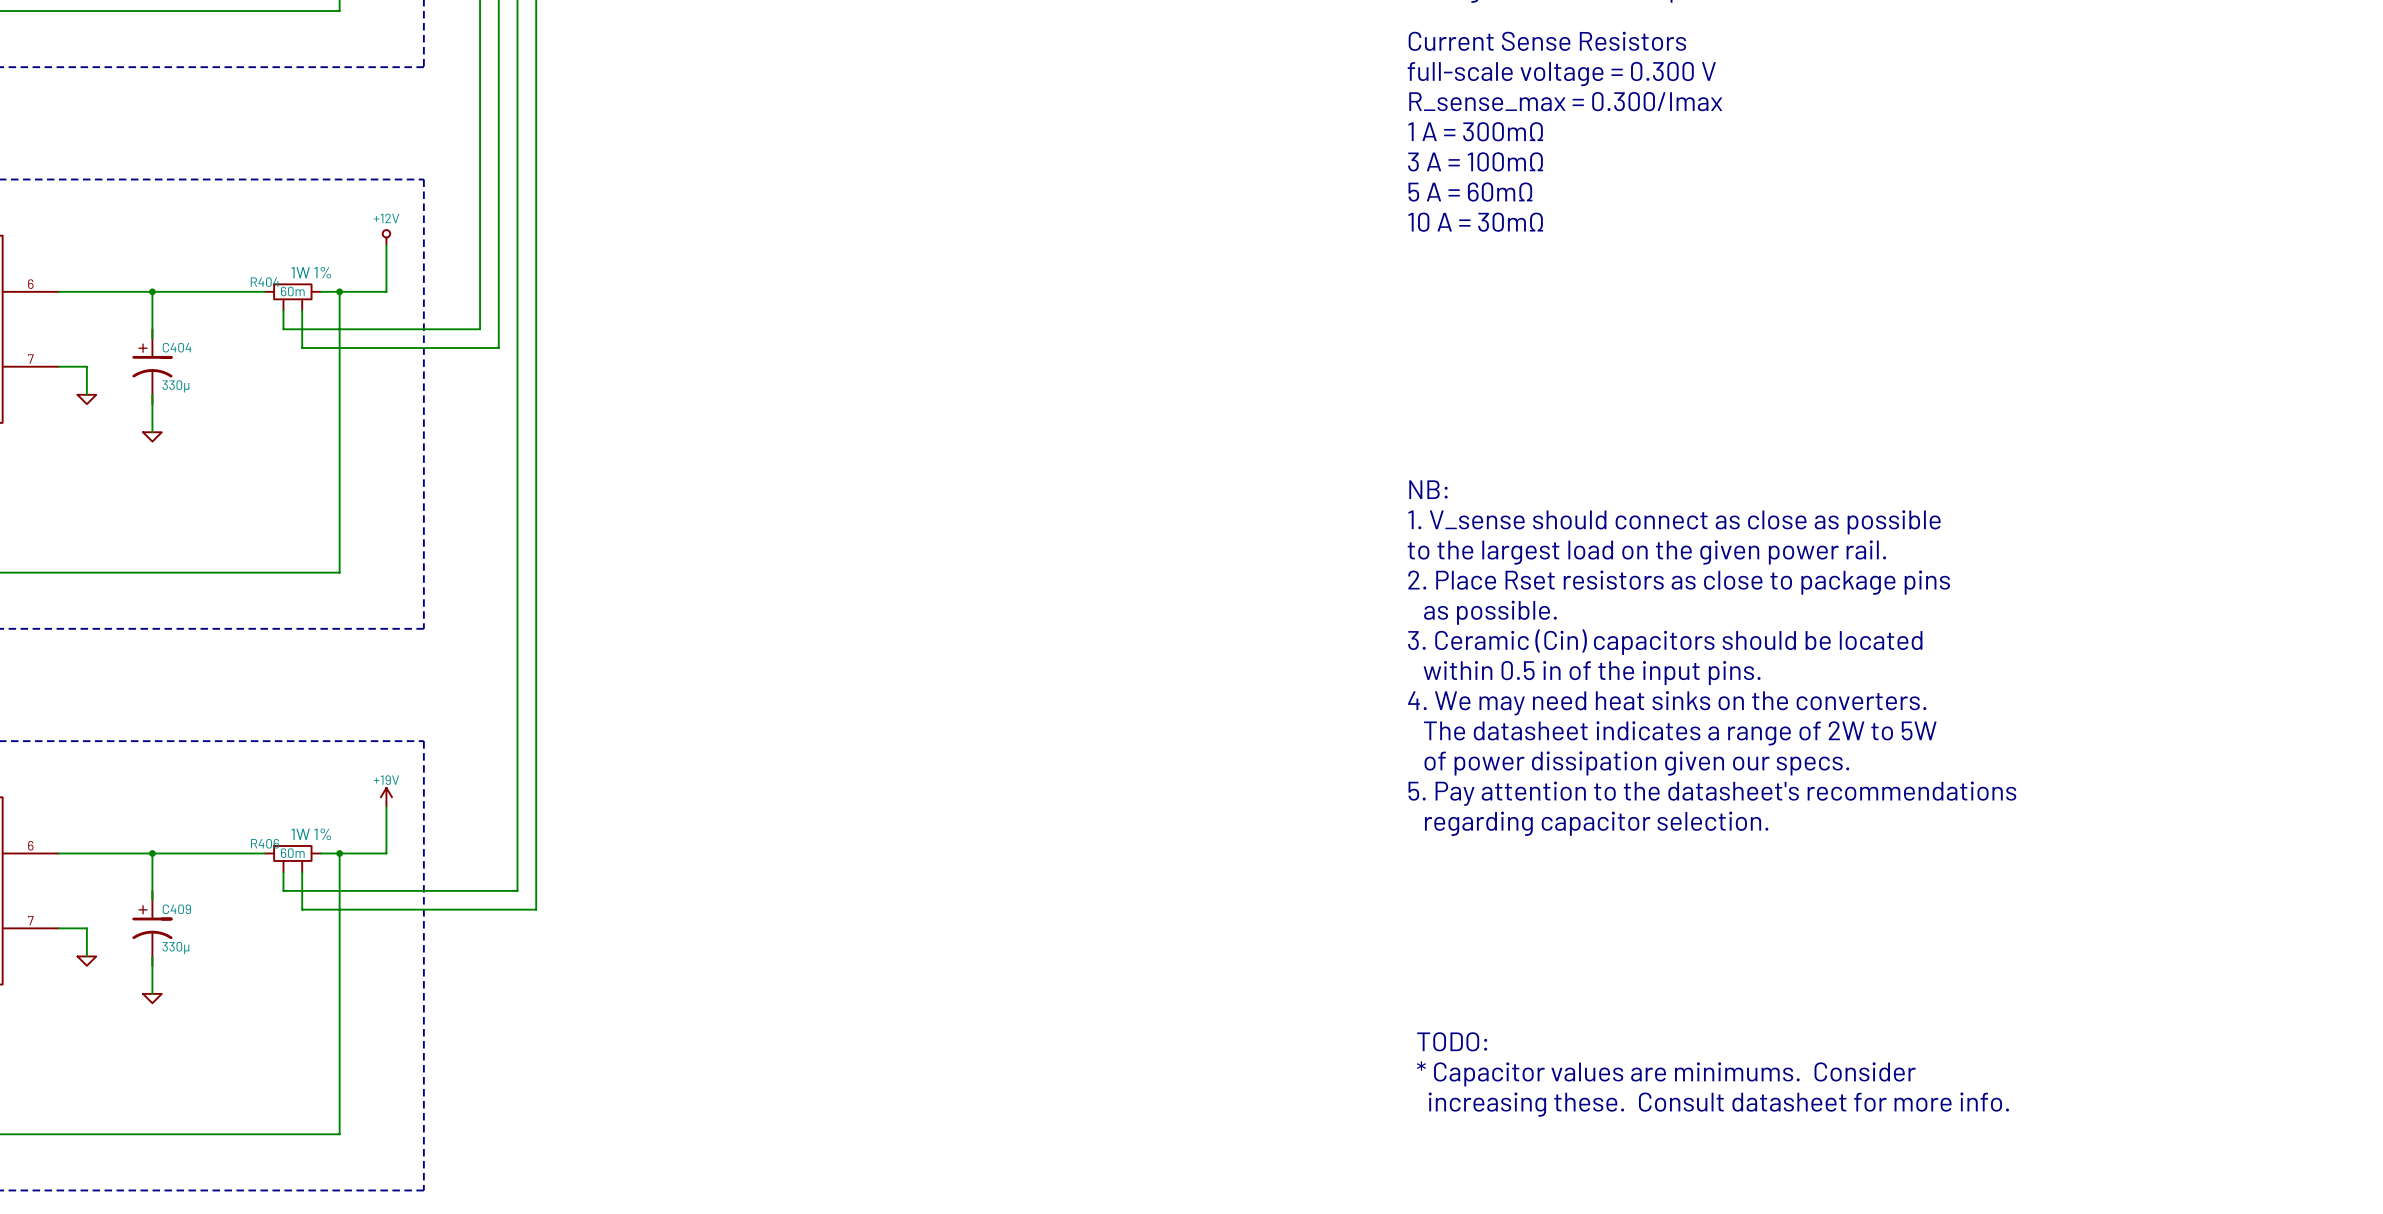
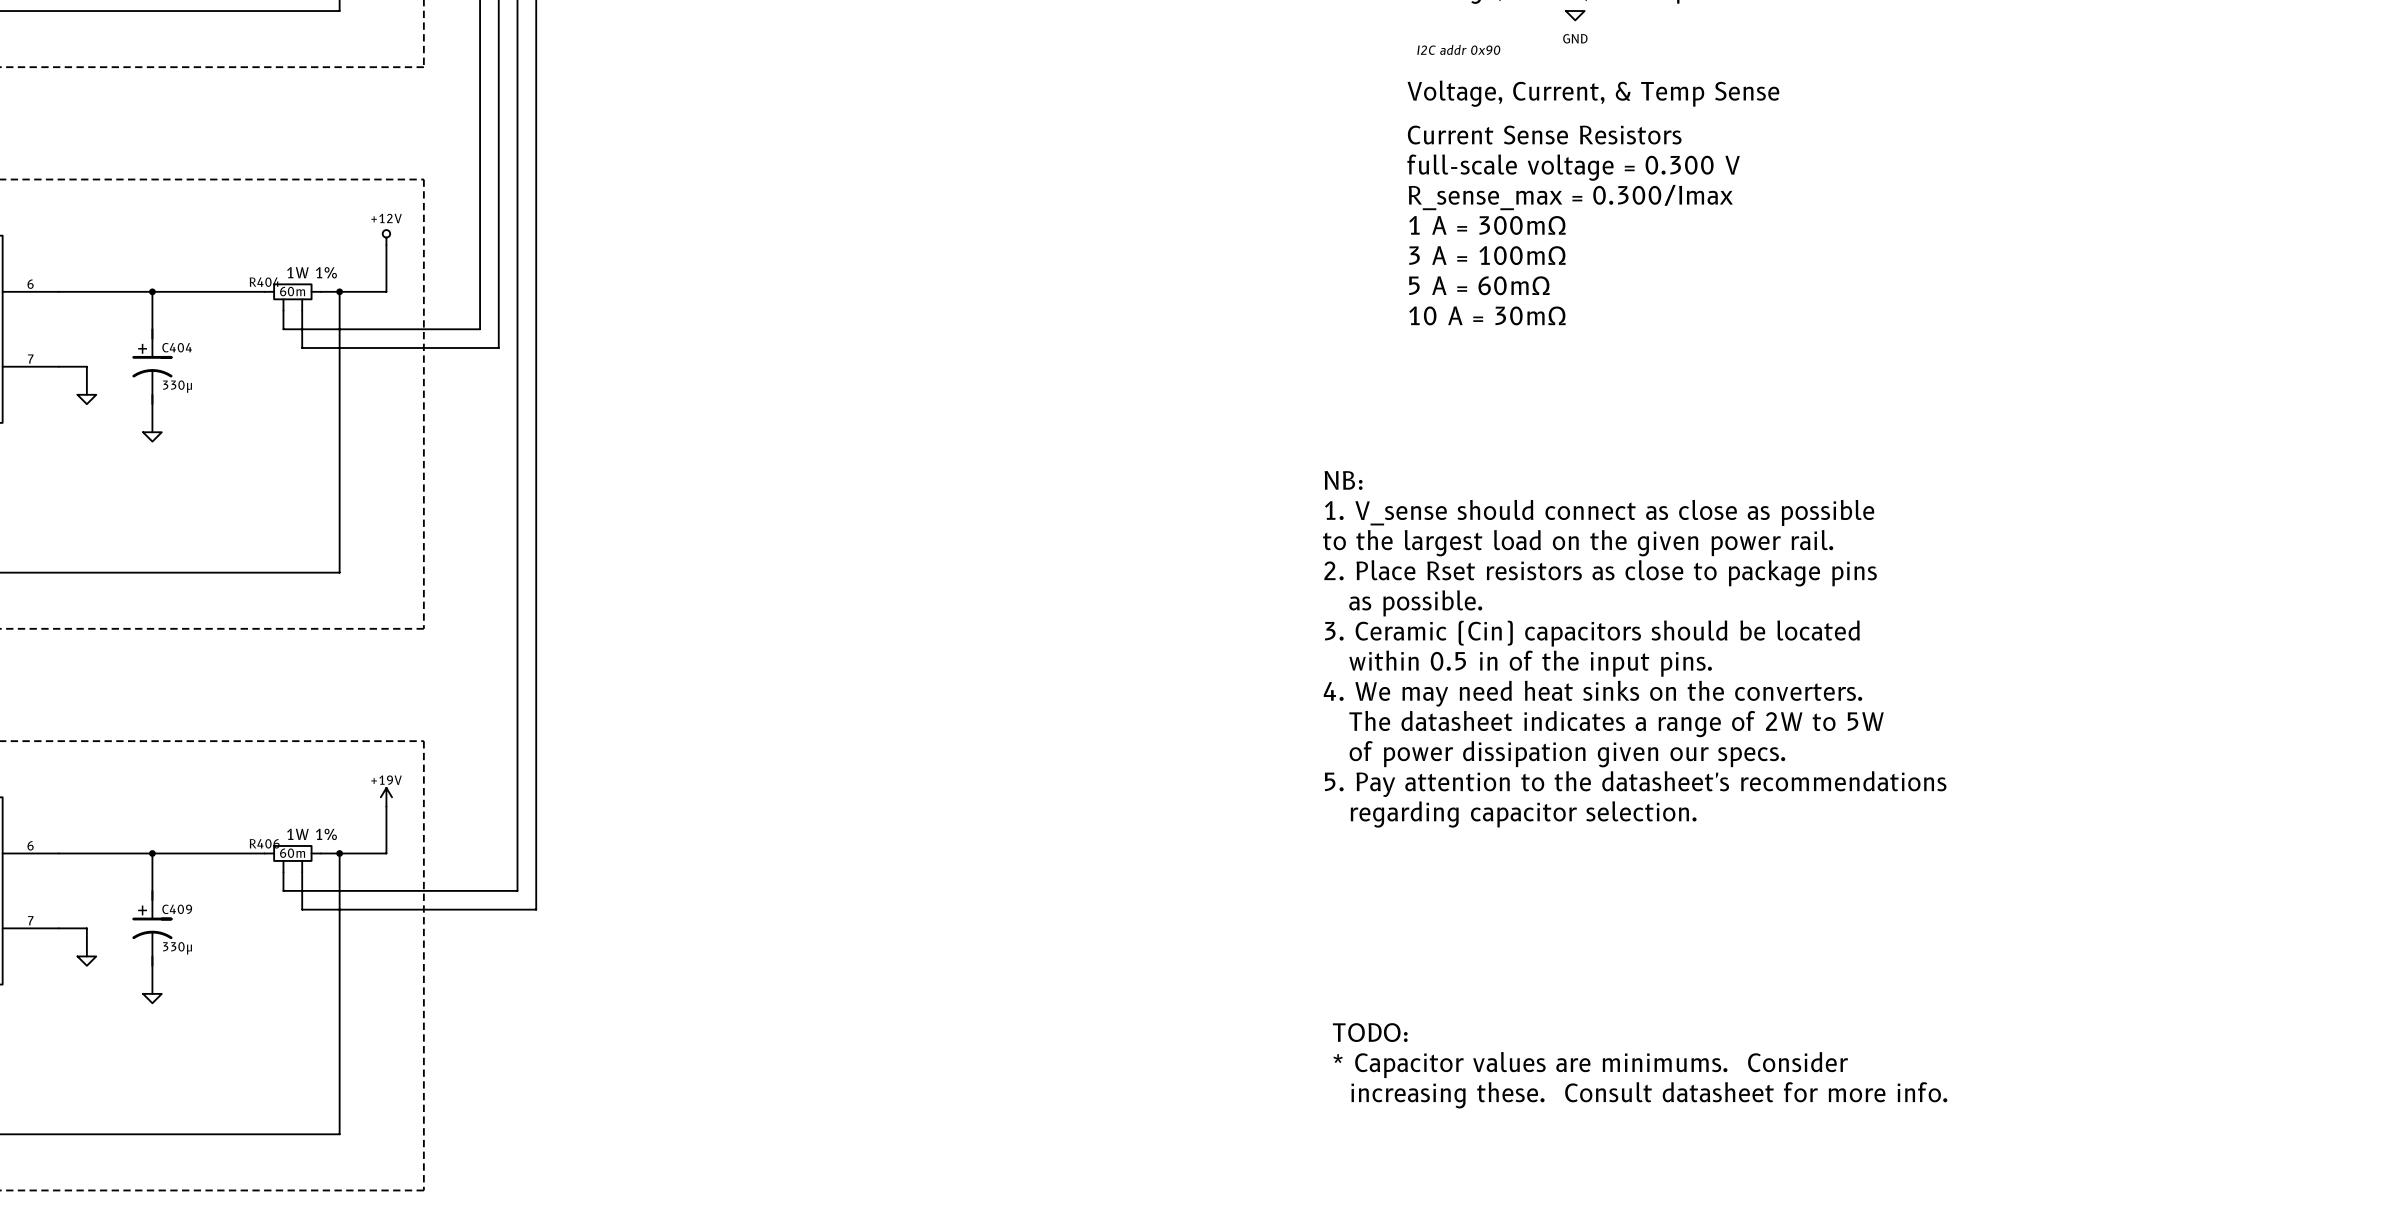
power symbol: none -> GND (1575, 15)
text position: Current Sense Resistors (1547, 41) -> Current Sense Resistors (1544, 135)
text: none -> I2C addr 0x90 (1458, 49)
text position: full-scale voltage = 0.300 V (1561, 74) -> full-scale voltage = 0.300 V (1573, 167)
text: none -> Voltage, Current, & Temp Sense (1593, 93)
text position: R_sense_max = 0.300/Imax (1565, 101) -> R_sense_max = 0.300/Imax (1570, 197)
text position: 1 A = 300mΩ (1475, 131) -> 1 A = 300mΩ (1487, 225)
text position: 3 A = 100mΩ (1475, 161) -> 3 A = 100mΩ (1487, 255)
text position: 5 A = 60mΩ (1470, 192) -> 5 A = 60mΩ (1479, 285)
text position: 10 A = 30mΩ (1475, 222) -> 10 A = 30mΩ (1487, 315)
text position: NB: (1428, 489) -> NB: (1343, 480)
text position: 1. V_sense should connect as close as possible (1674, 522) -> 1. V_sense should connect as close as possible (1599, 512)
text position: to the largest load on the given power rail. (1646, 552) -> to the largest load on the given power rail. (1578, 543)
text position: 2. Place Rset resistors as close to package pins (1679, 582) -> 2. Place Rset resistors as close to package pins (1600, 573)
text position: as possible. (1490, 612) -> as possible. (1415, 603)
text position: 3. Ceramic (Cin) capacitors should be located (1665, 642) -> 3. Ceramic (Cin) capacitors should be located (1592, 633)
text position: within 0.5 in of the input pins. (1592, 673) -> within 0.5 in of the input pins. (1530, 663)
text position: 4. We may need heat sinks on the converters. (1667, 703) -> 4. We may need heat sinks on the converters. (1592, 693)
text position: The datasheet indicates a range of 2W to 5W (1680, 733) -> The datasheet indicates a range of 2W to 5W (1616, 724)
text position: of power dissipation given our specs. (1636, 763) -> of power dissipation given our specs. (1567, 754)
text position: 5. Pay attention to the datasheet's recommendations (1712, 793) -> 5. Pay attention to the datasheet's recommendations (1635, 784)
text position: regarding capacitor selection. (1596, 823) -> regarding capacitor selection. (1523, 814)
text position: TODO: (1452, 1041) -> TODO: (1370, 1032)
text position: * Capacitor values are minimums. Consider (1666, 1073) -> * Capacitor values are minimums. Consider (1590, 1065)
text position: increasing these. Consult datasheet for more info. (1718, 1104) -> increasing these. Consult datasheet for more info. (1649, 1095)

